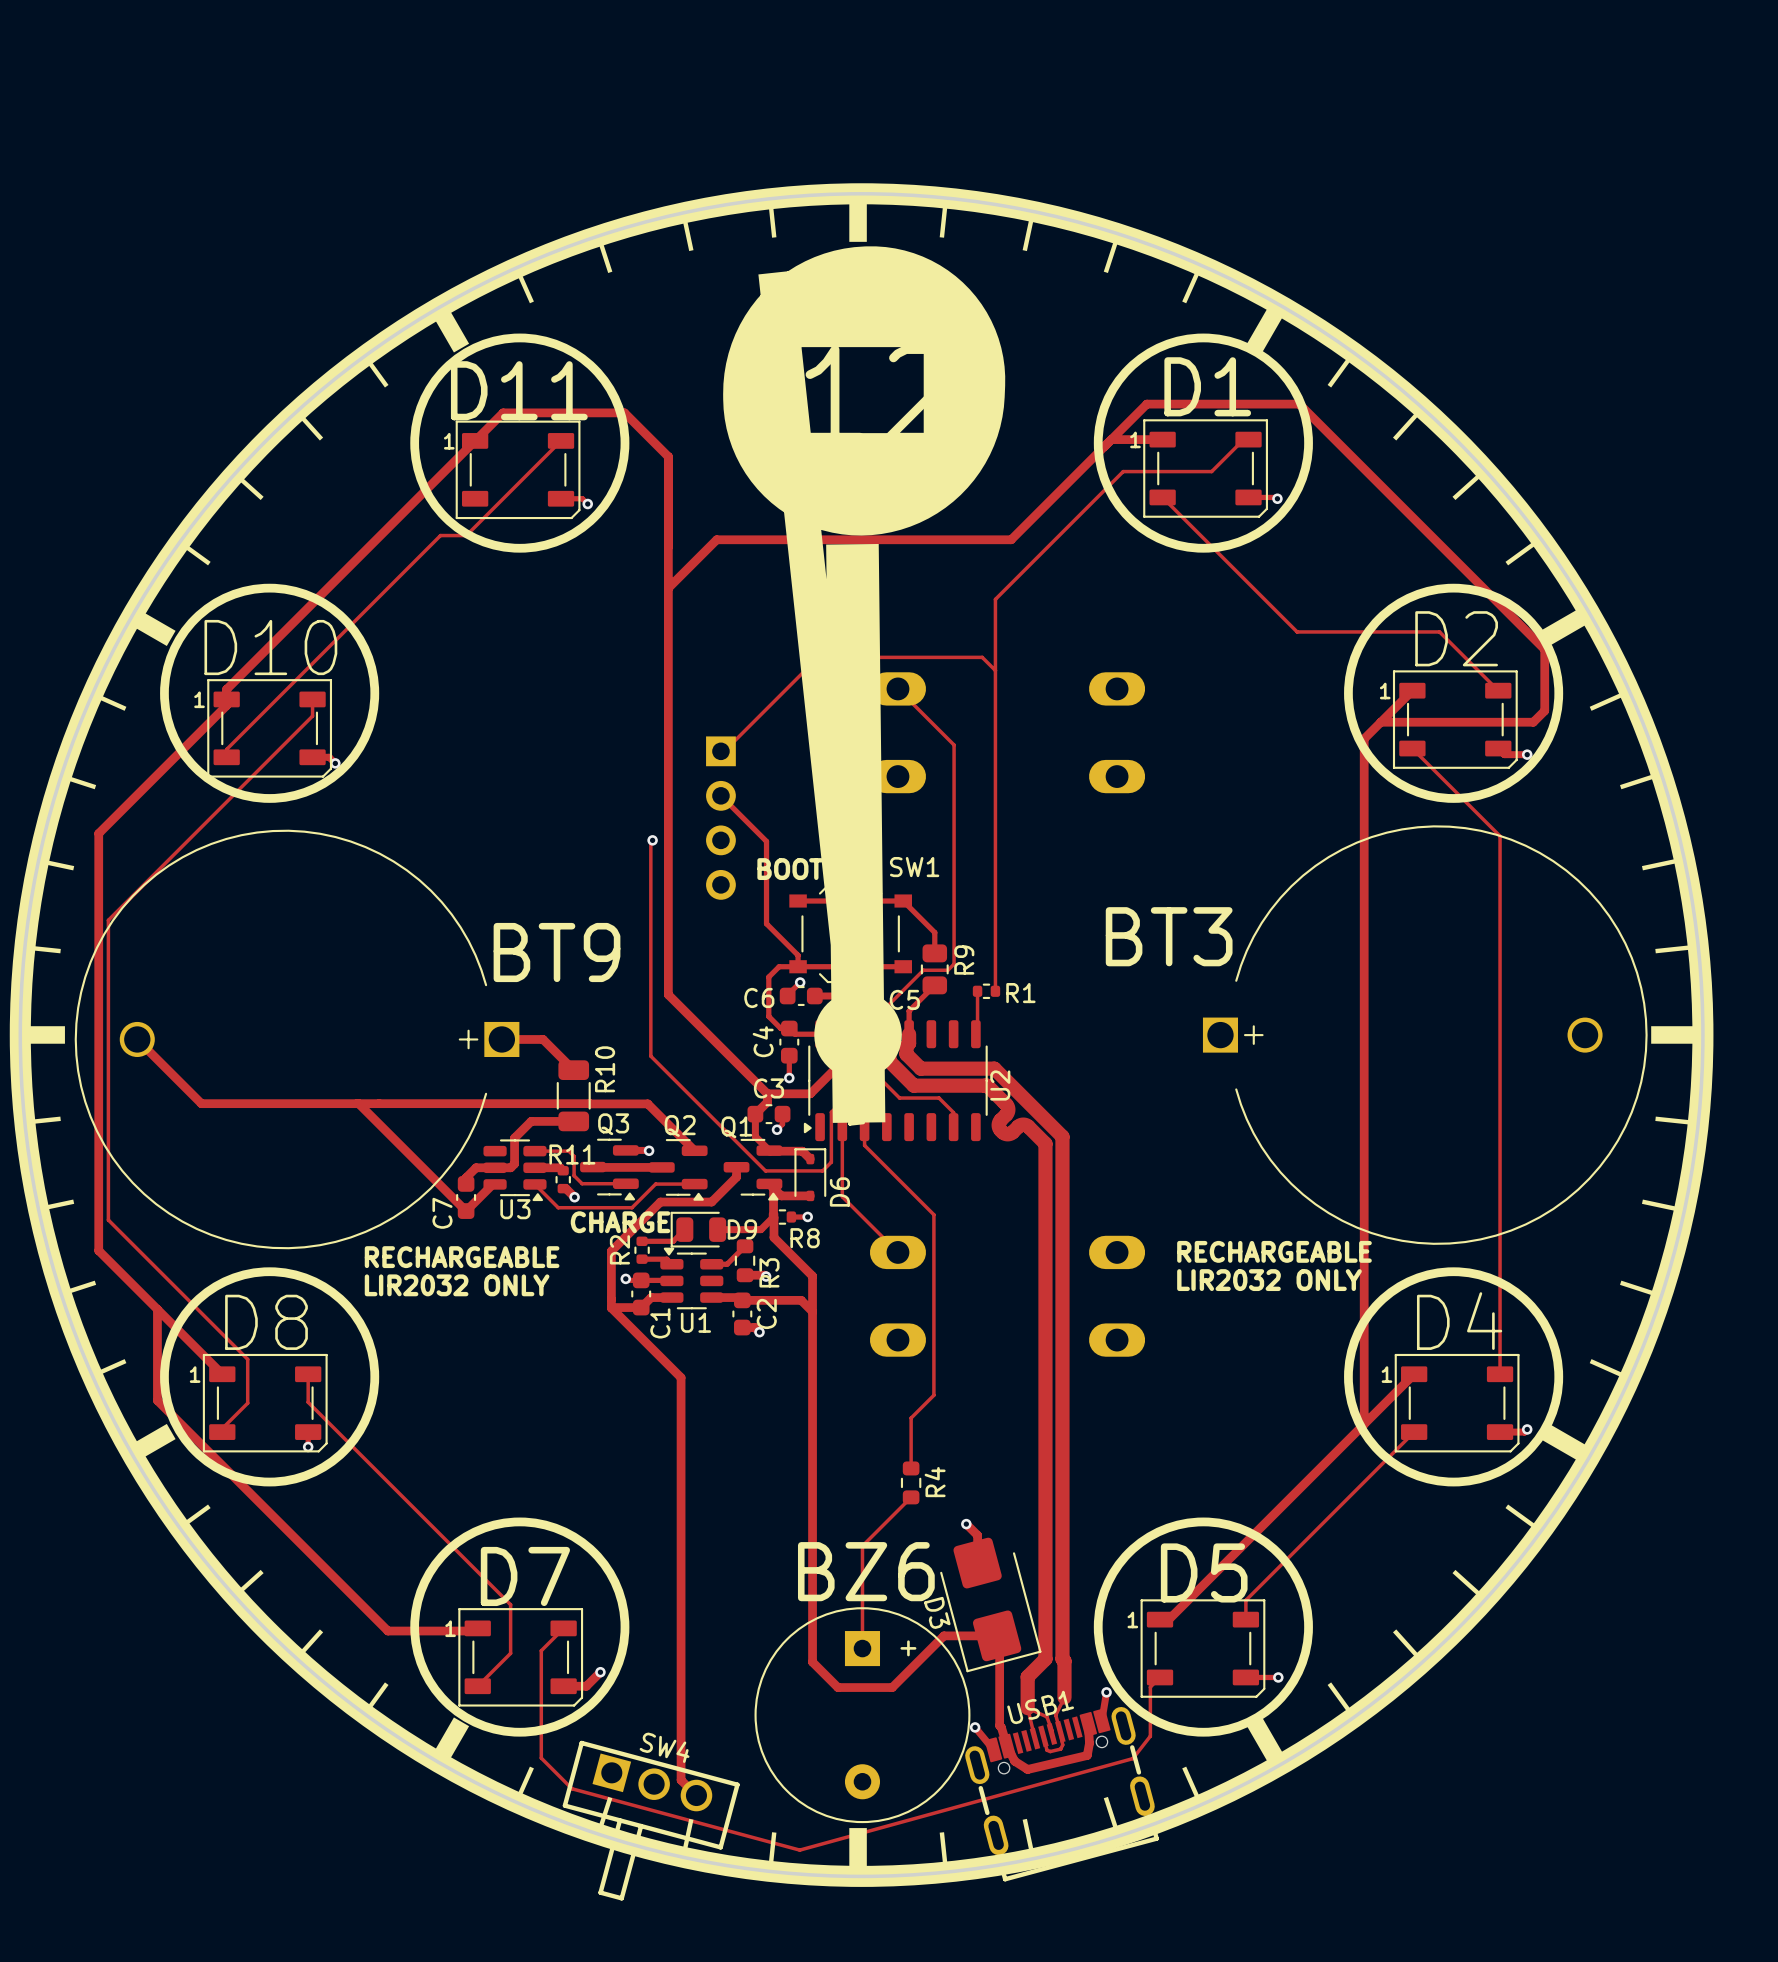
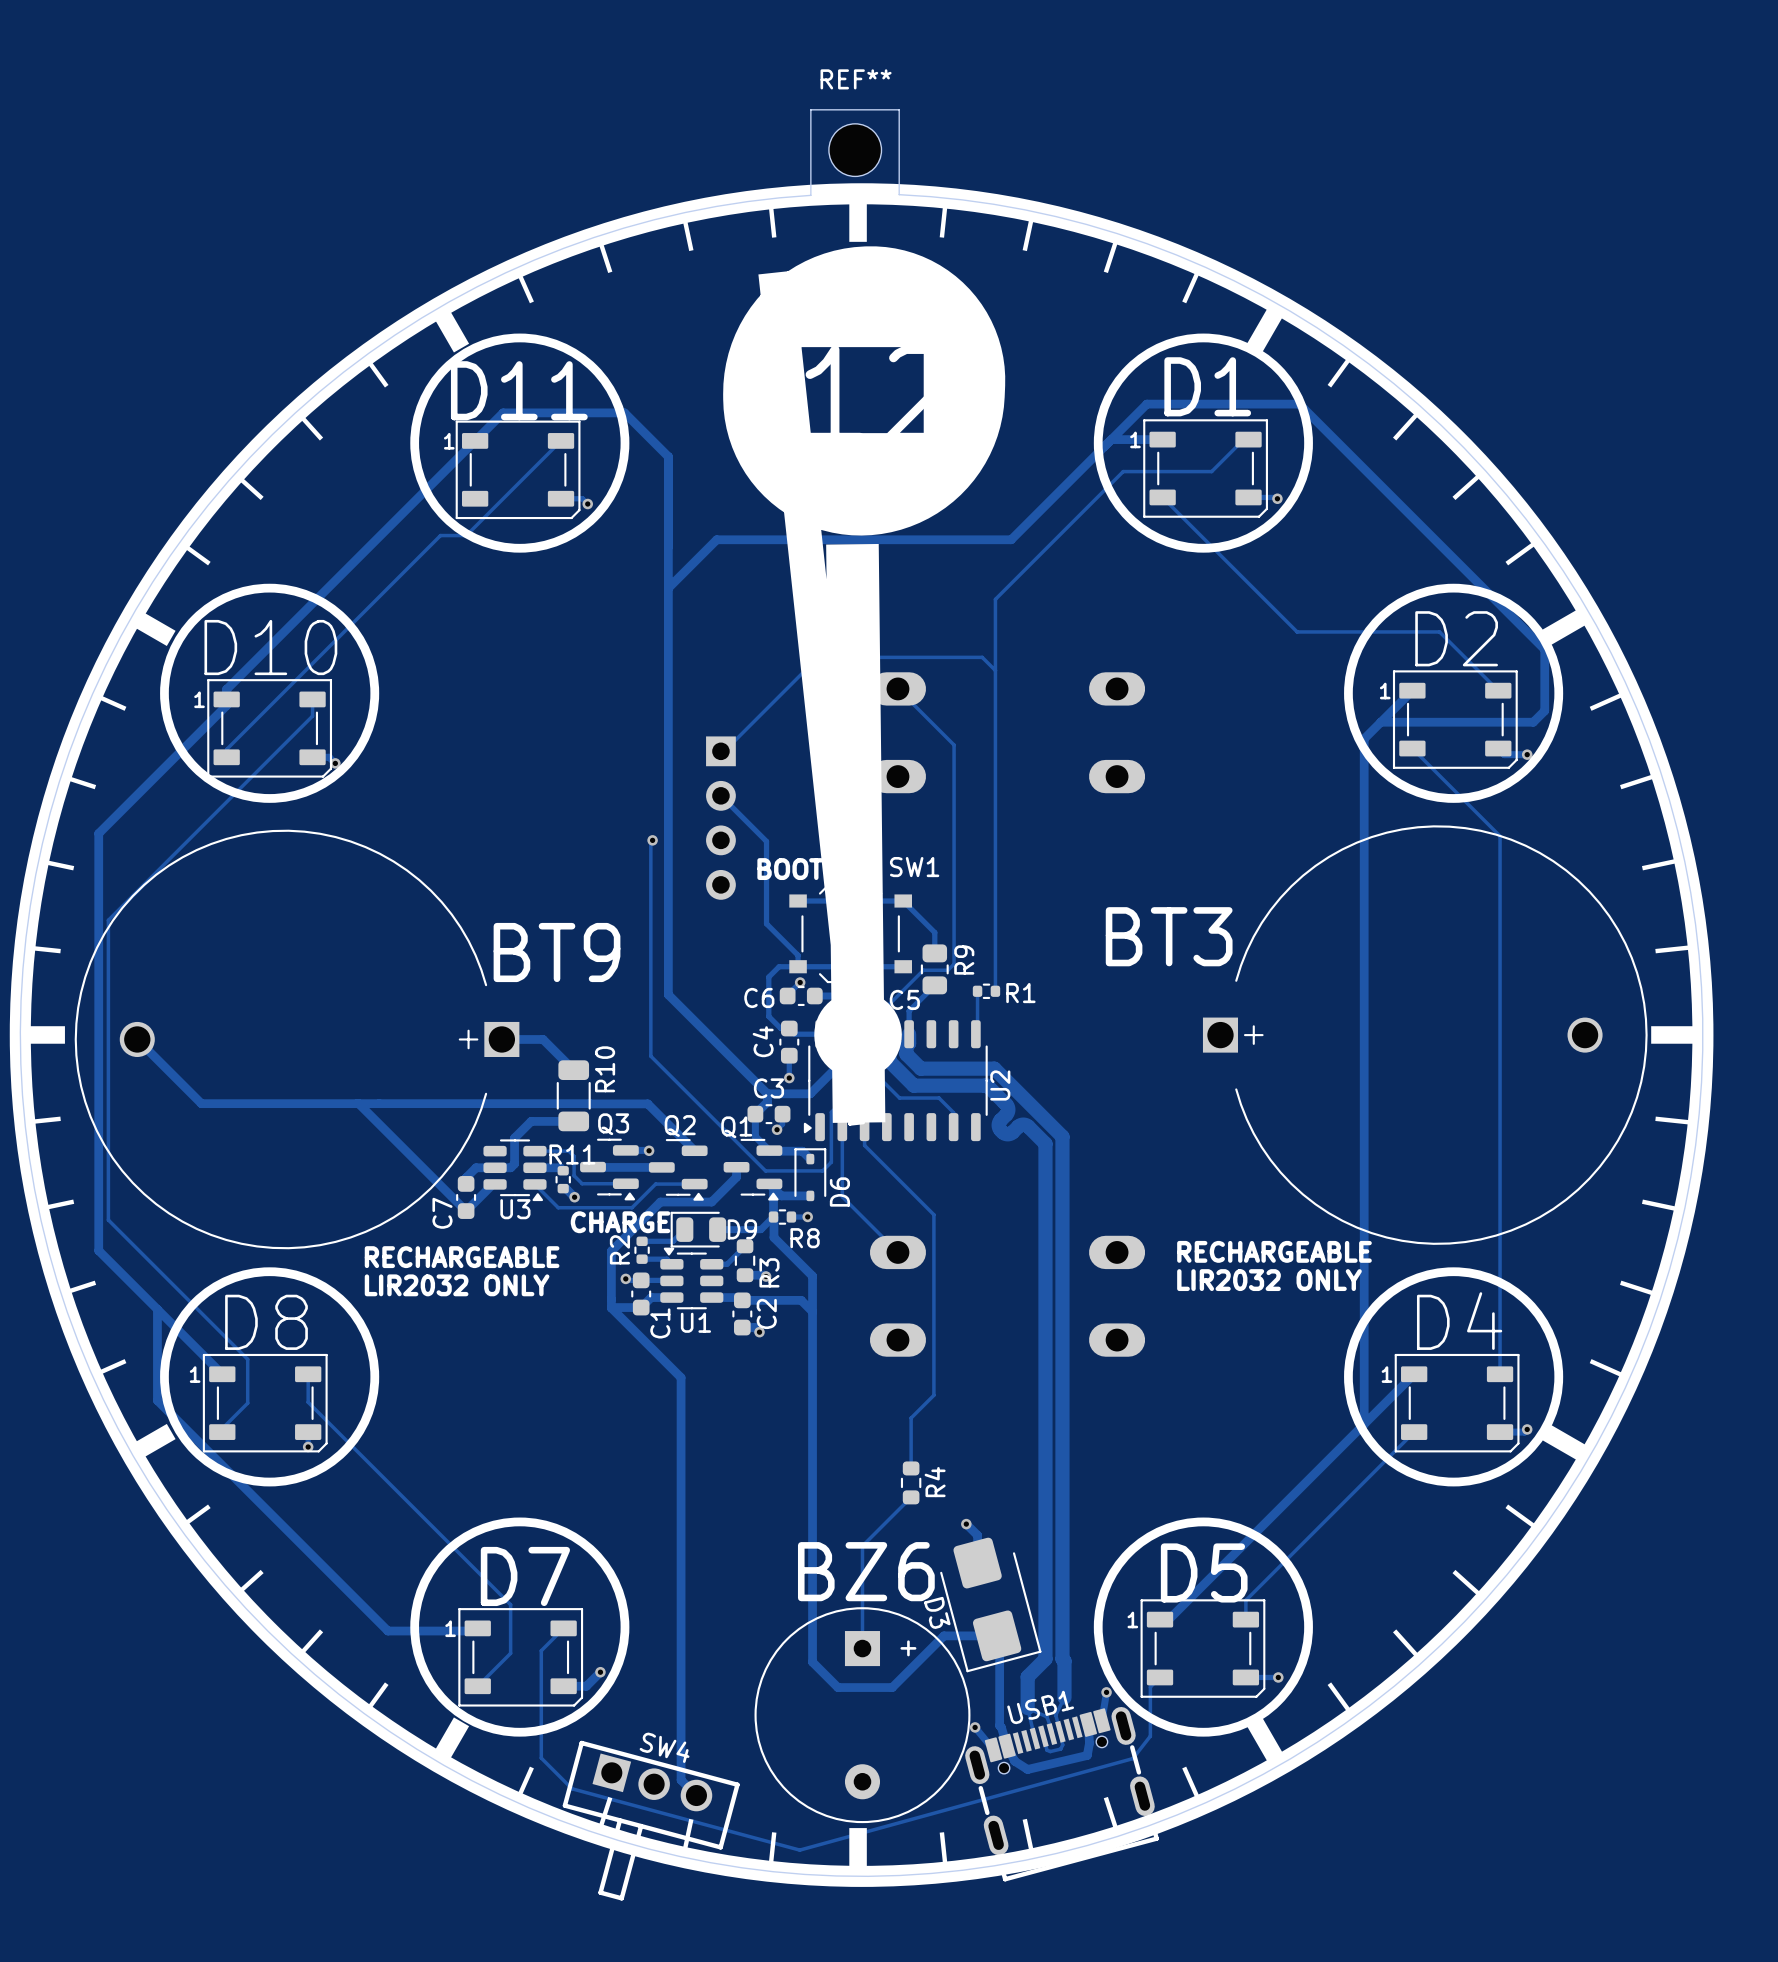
board edge: none -> (810, 109) (899, 109) (899, 194) (993, 204) (1055, 216) (1146, 243) (1205, 267) (1262, 295) (1317, 327) (1369, 364) (1441, 425) (1485, 470) (1545, 544) (1580, 597) (1625, 681) (1649, 740) (1677, 830) (1695, 924) (1701, 987) (1702, 1050) (1695, 1145) (1677, 1238) (1660, 1299) (1625, 1387) (1580, 1471) (1545, 1524) (1486, 1598) (1418, 1665) (1343, 1724) (1263, 1774) (1206, 1802) (1147, 1826) (1056, 1853) (963, 1870) (899, 1875) (836, 1875) (741, 1867) (679, 1856) (588, 1830) (500, 1794) (443, 1765) (364, 1713) (290, 1653) (224, 1584) (166, 1509) (117, 1428) (90, 1371) (67, 1312) (41, 1220) (25, 1126) (20, 1063) (22, 968) (30, 905) (42, 843) (69, 752) (92, 693) (120, 636) (170, 555) (208, 505) (272, 434) (319, 392) (395, 335) (477, 286) (563, 248) (623, 228) (716, 206) (810, 195) (810, 109)
REF**: none -> (855, 150)
round board edge: [18, 192, 1705, 1879] -> none

